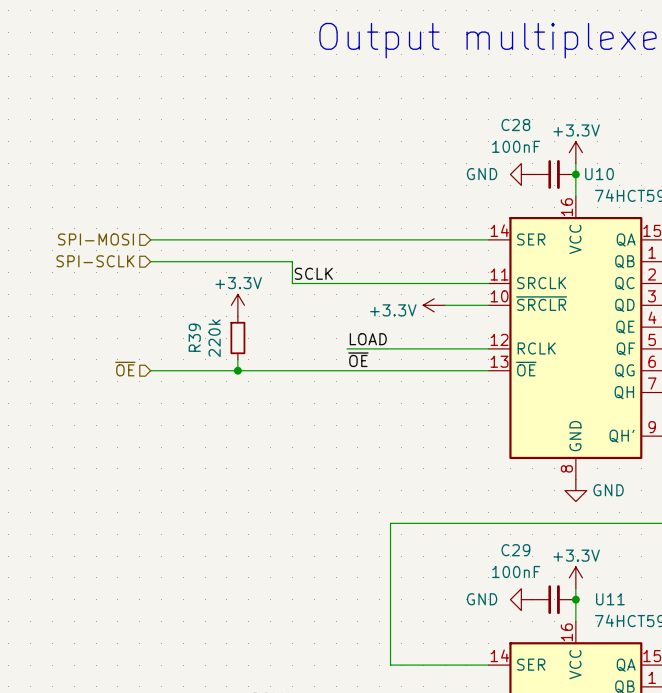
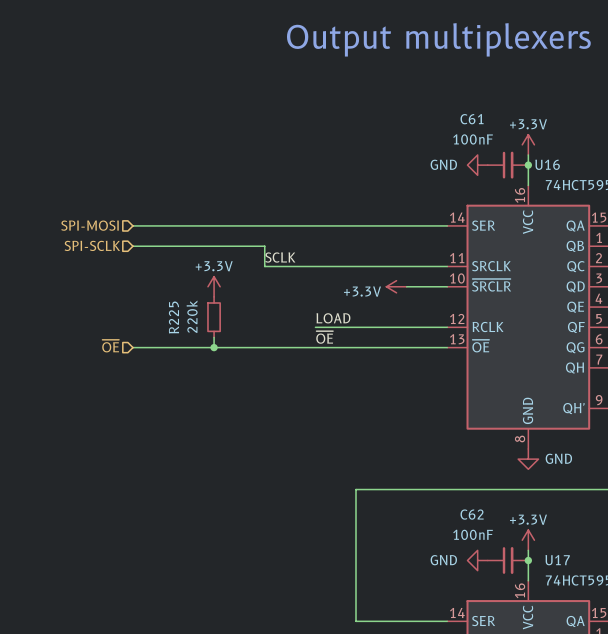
C28 name: C28 (515, 125) -> C61 (472, 119)
U10 name: U10 (599, 174) -> U16 (547, 164)
R39 name: R39 (194, 337) -> R225 (173, 317)
C29 name: C29 (515, 550) -> C62 (472, 514)
U11 name: U11 (610, 599) -> U17 (557, 560)

